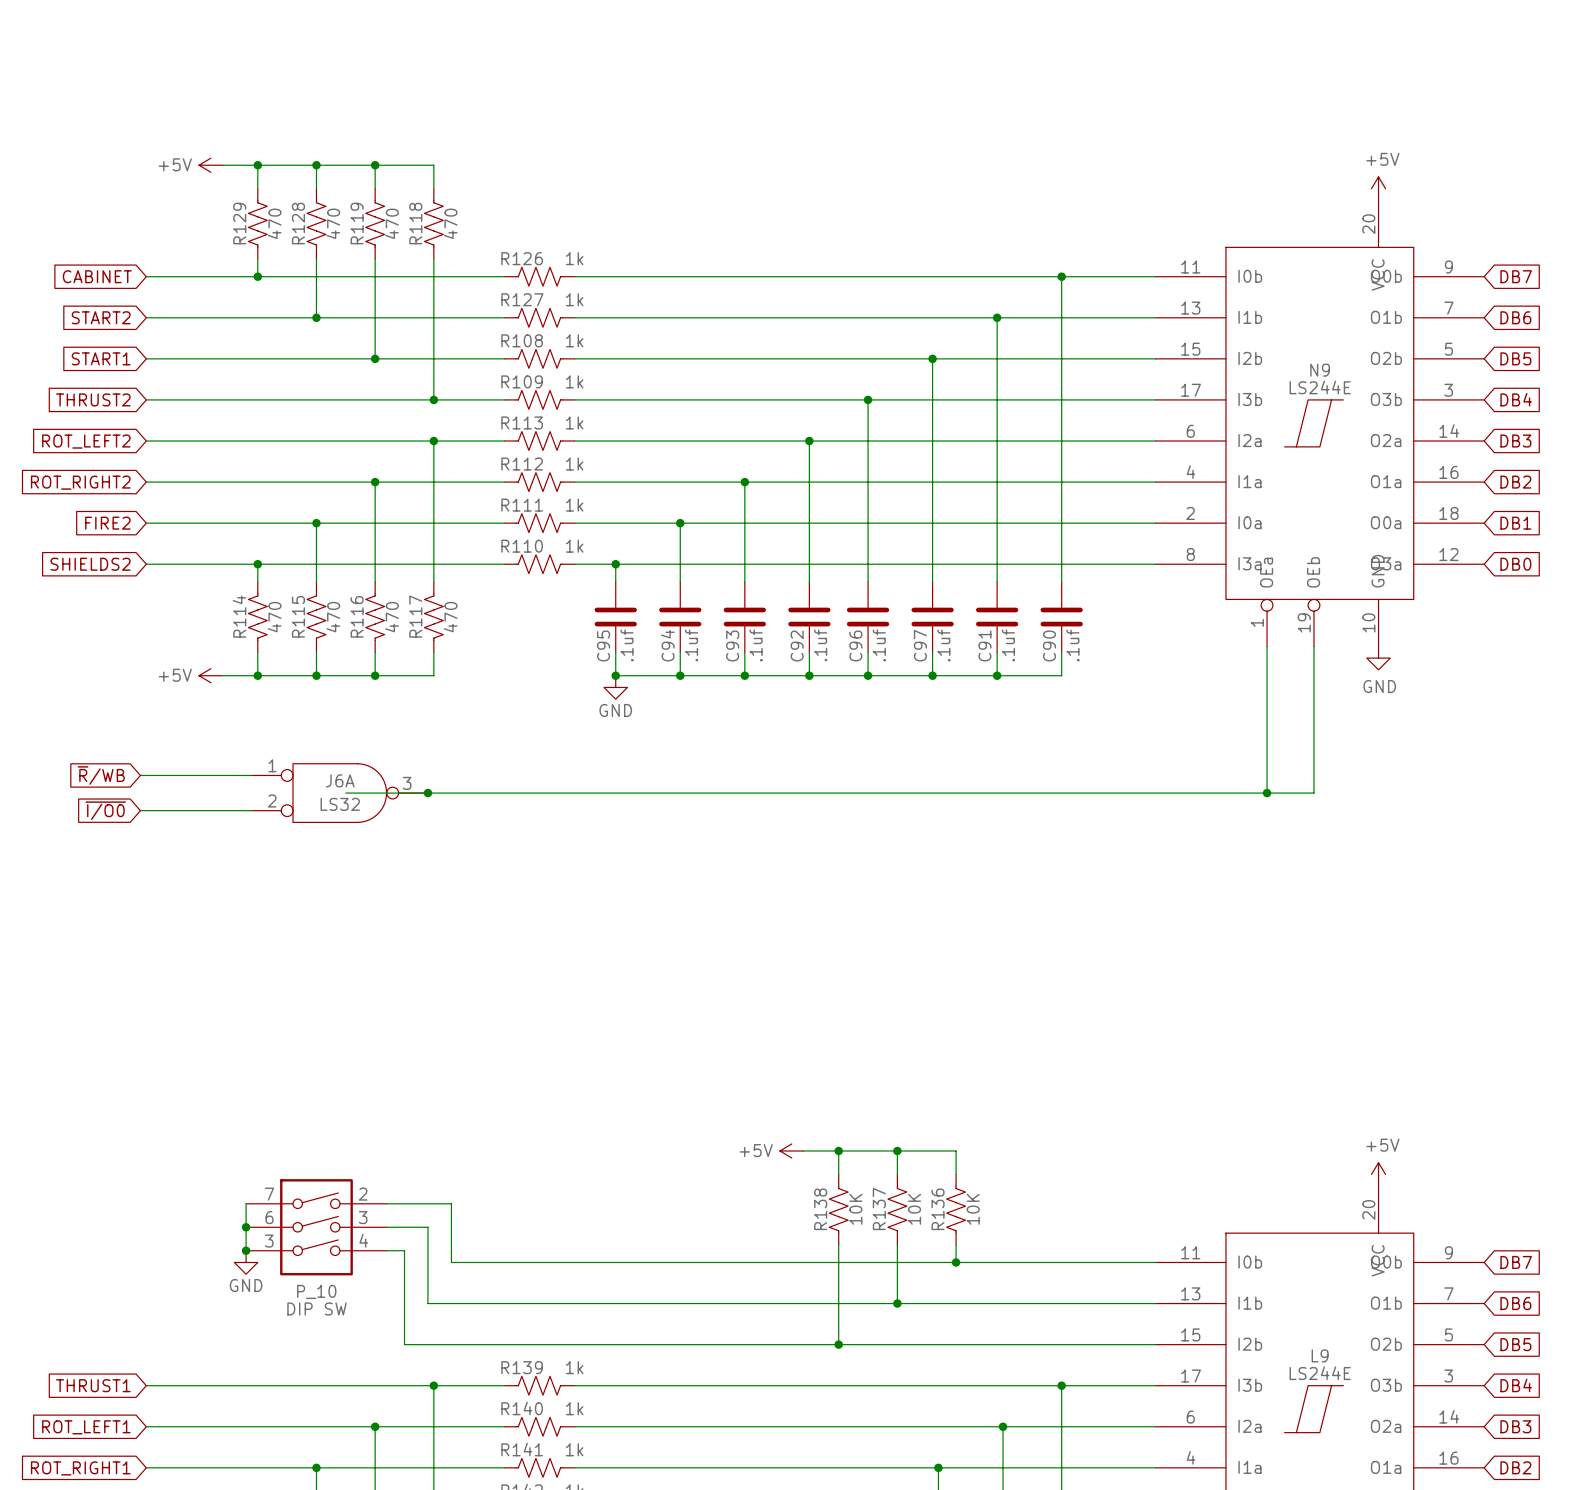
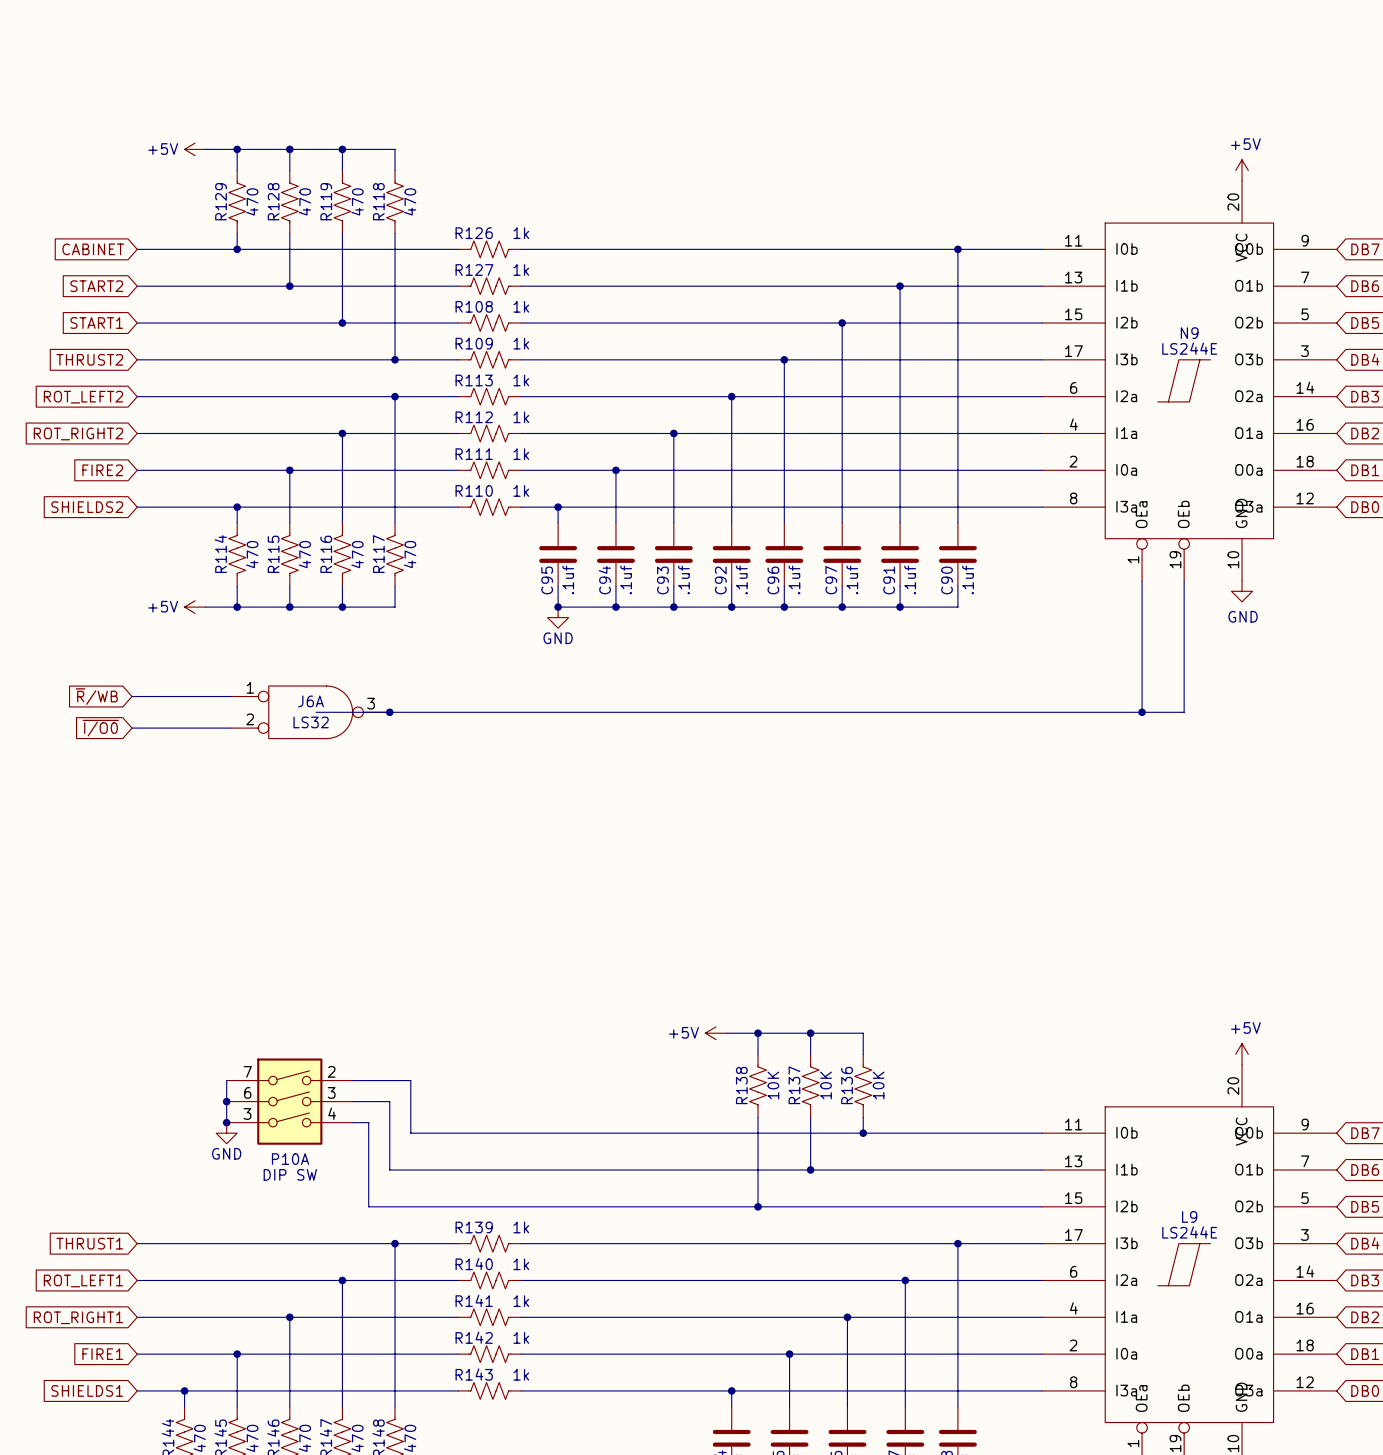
P_10 name: P_10 (316, 1291) -> P10A (290, 1159)

